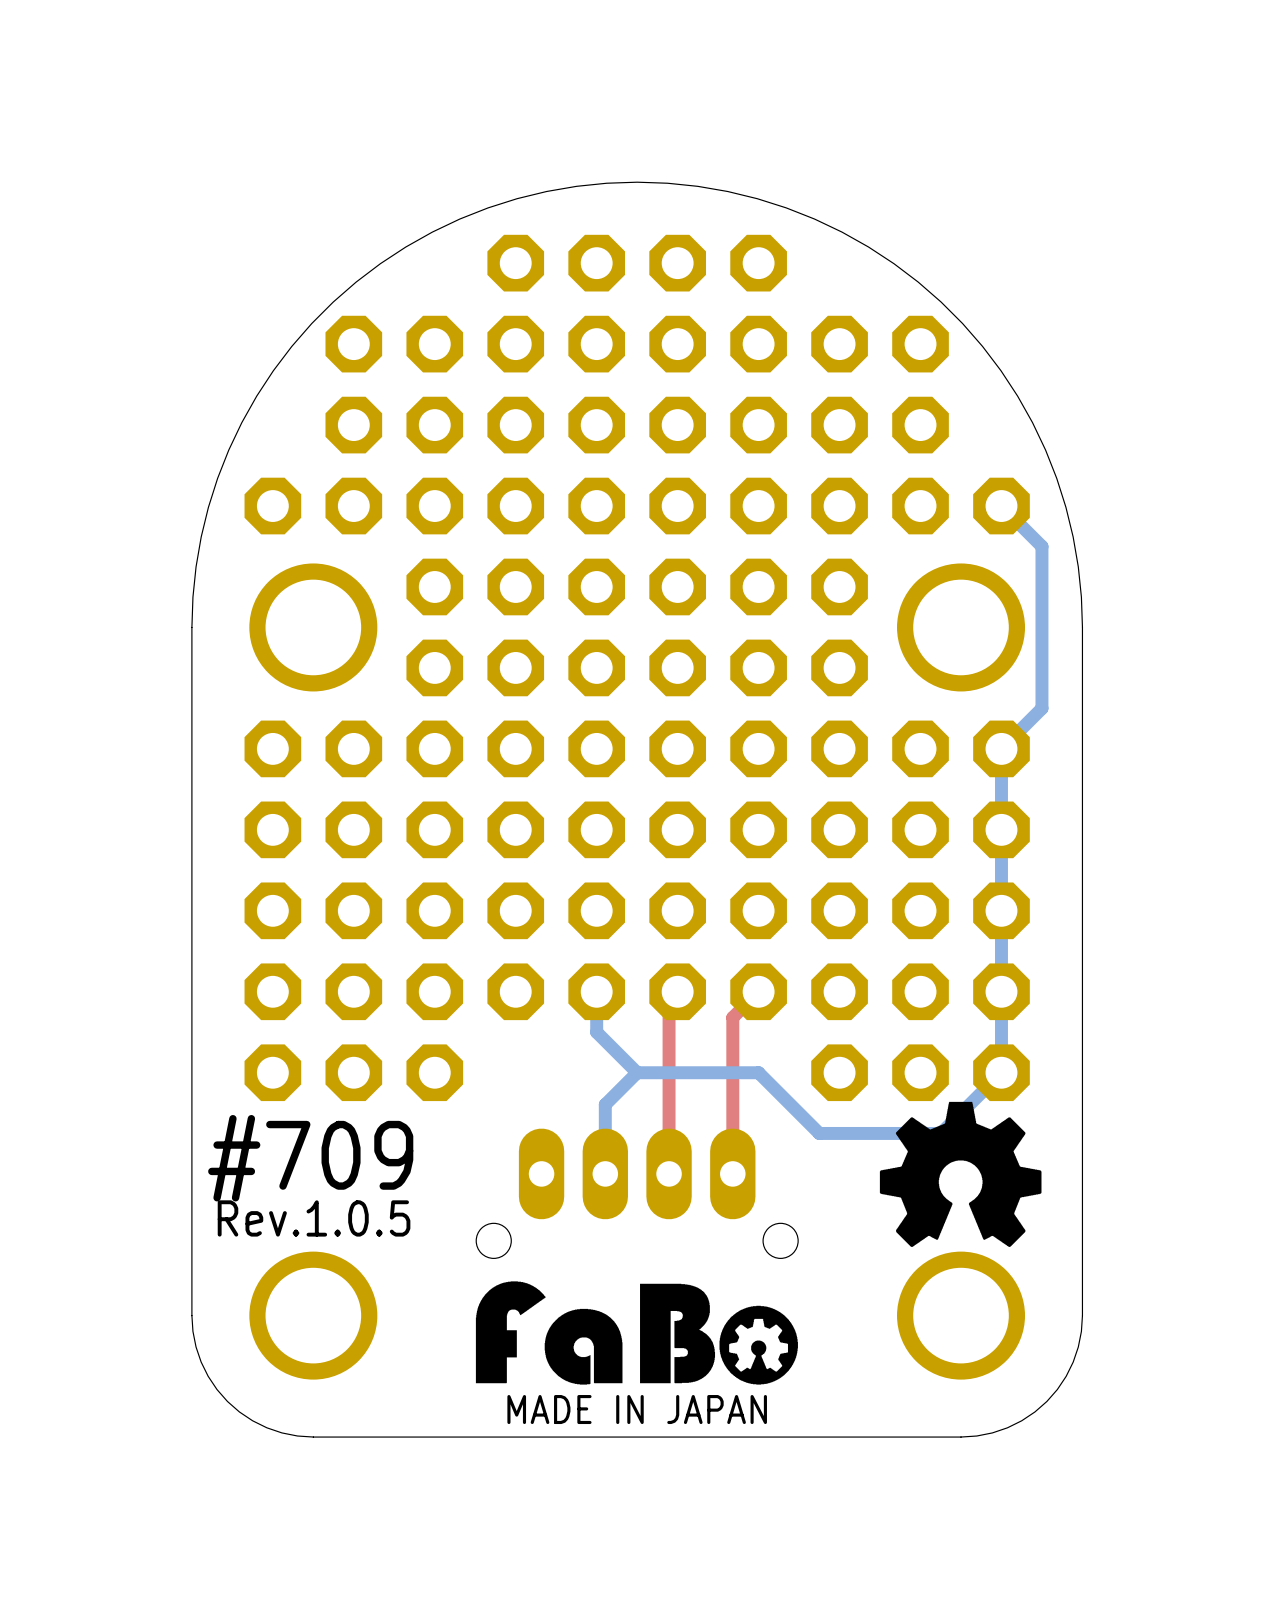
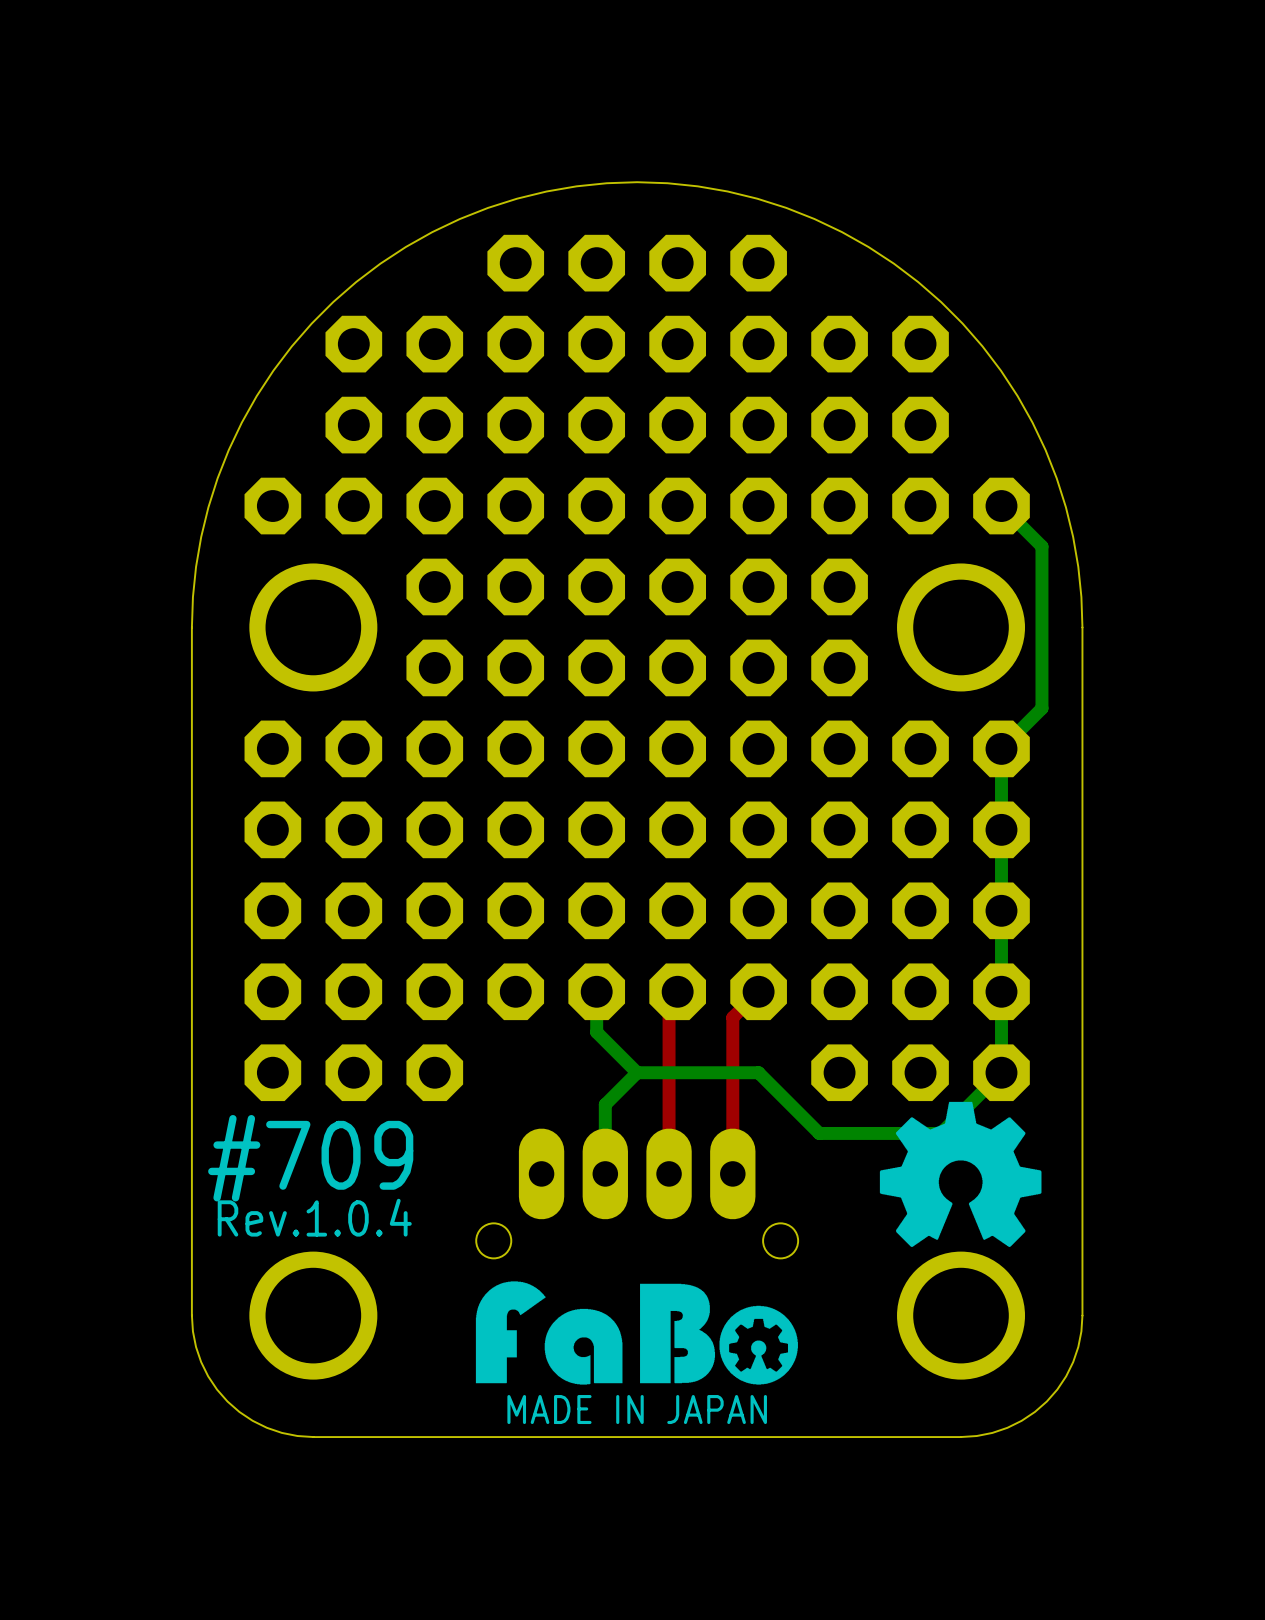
text: Rev.1.0.5 (314, 1218) -> Rev.1.0.4 (314, 1217)

